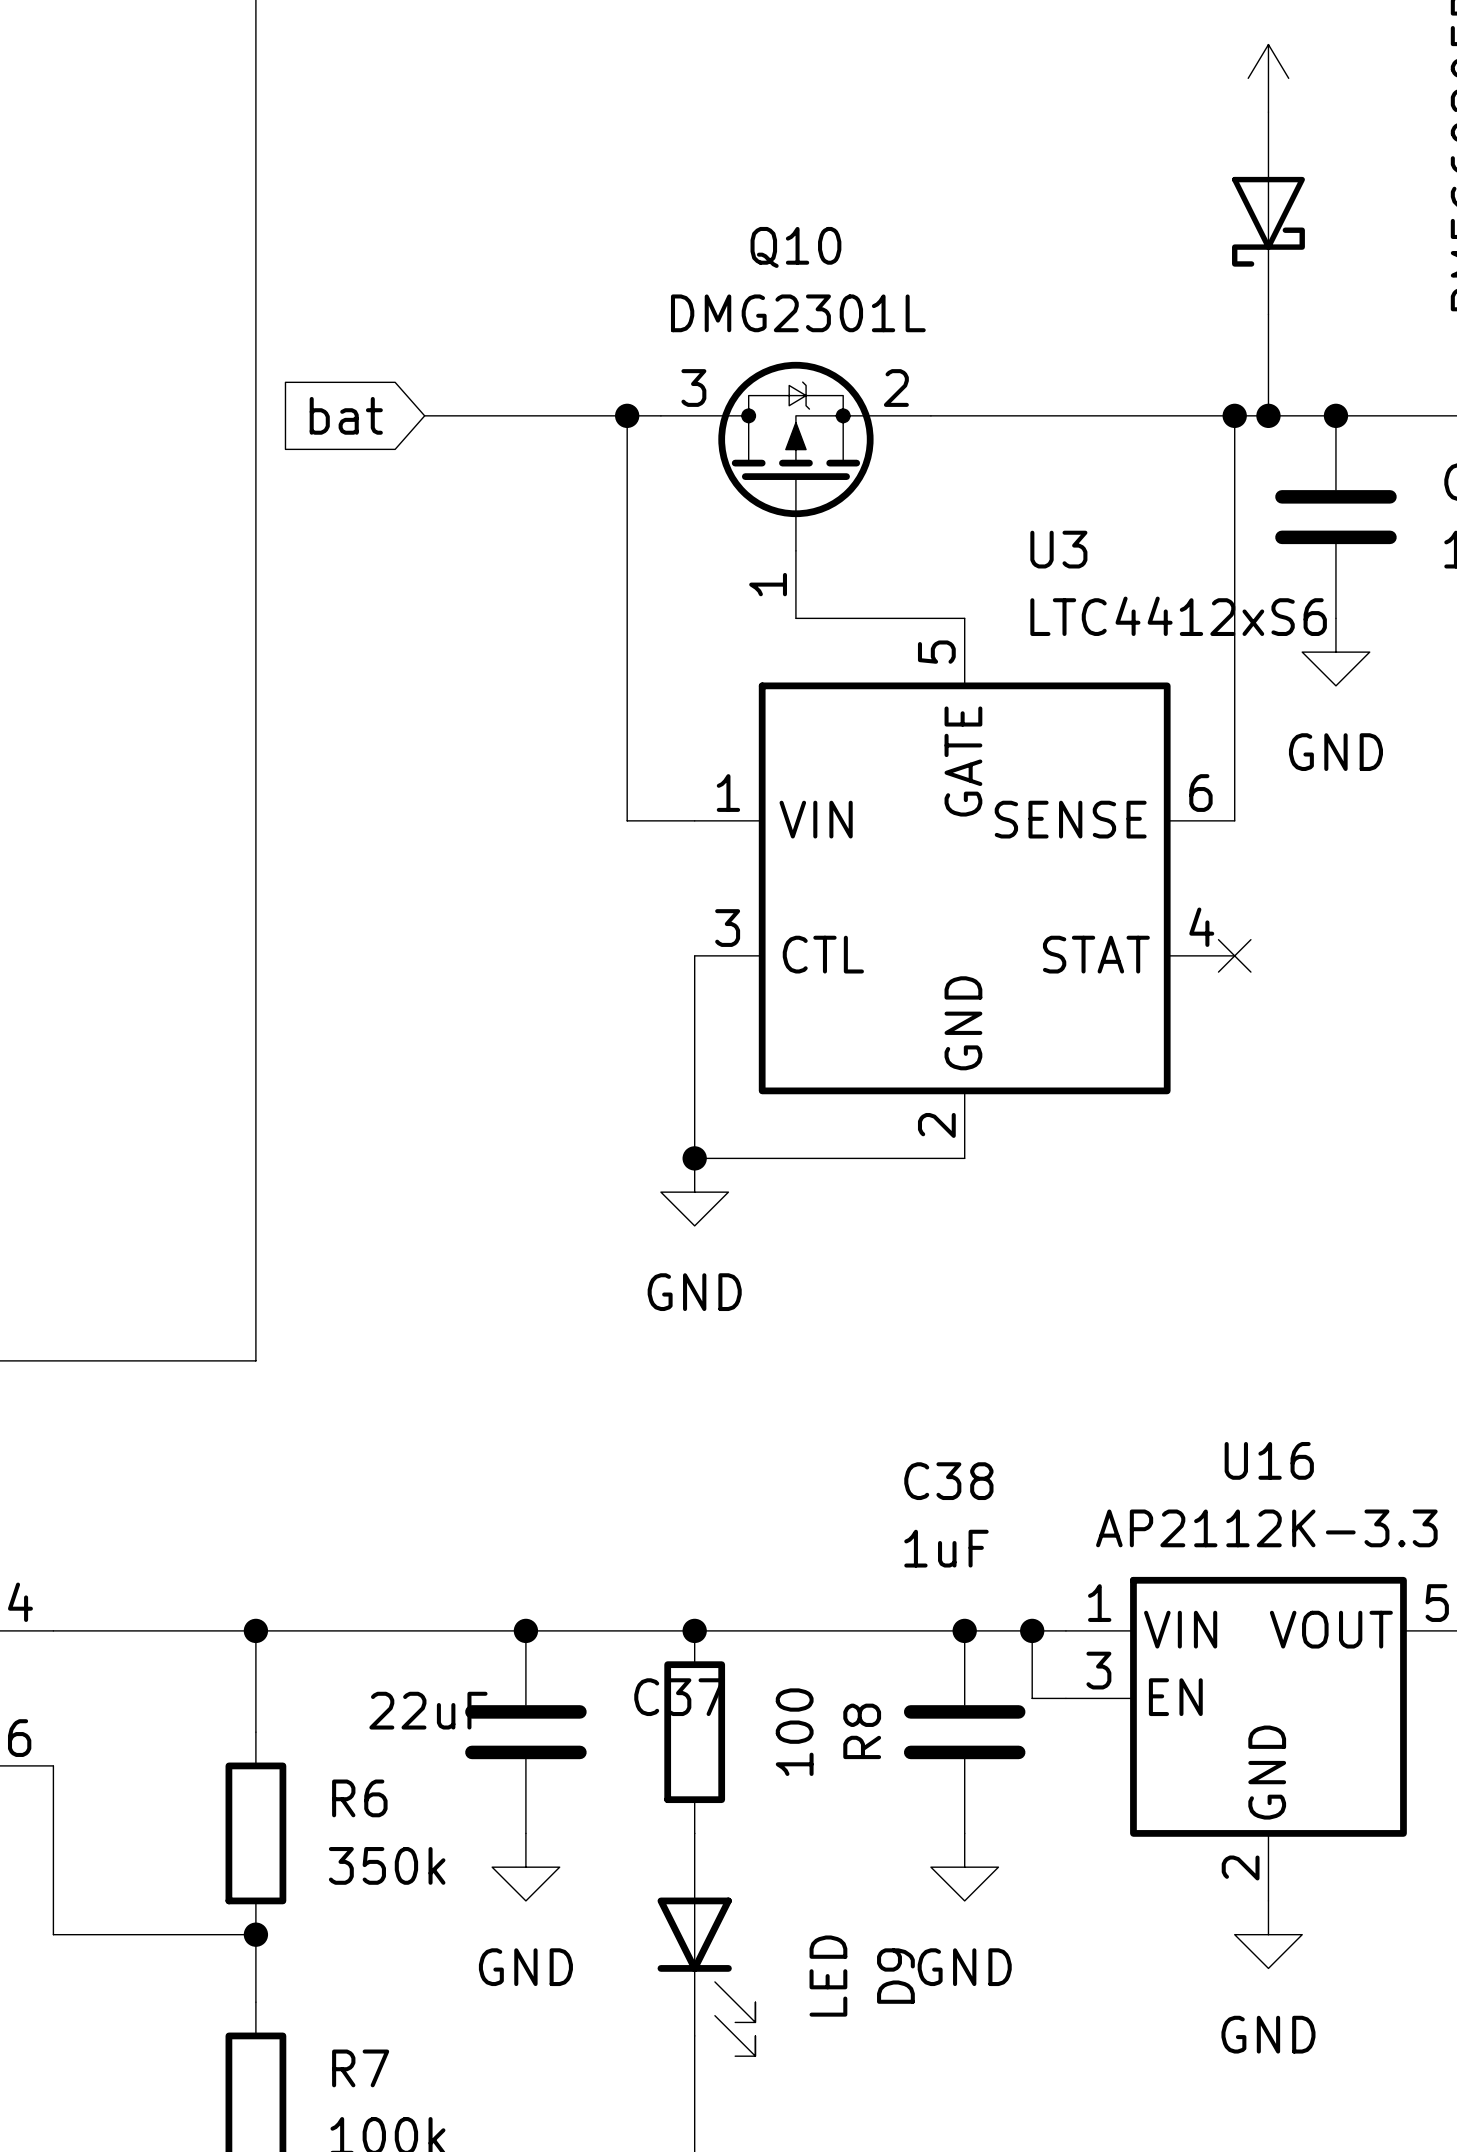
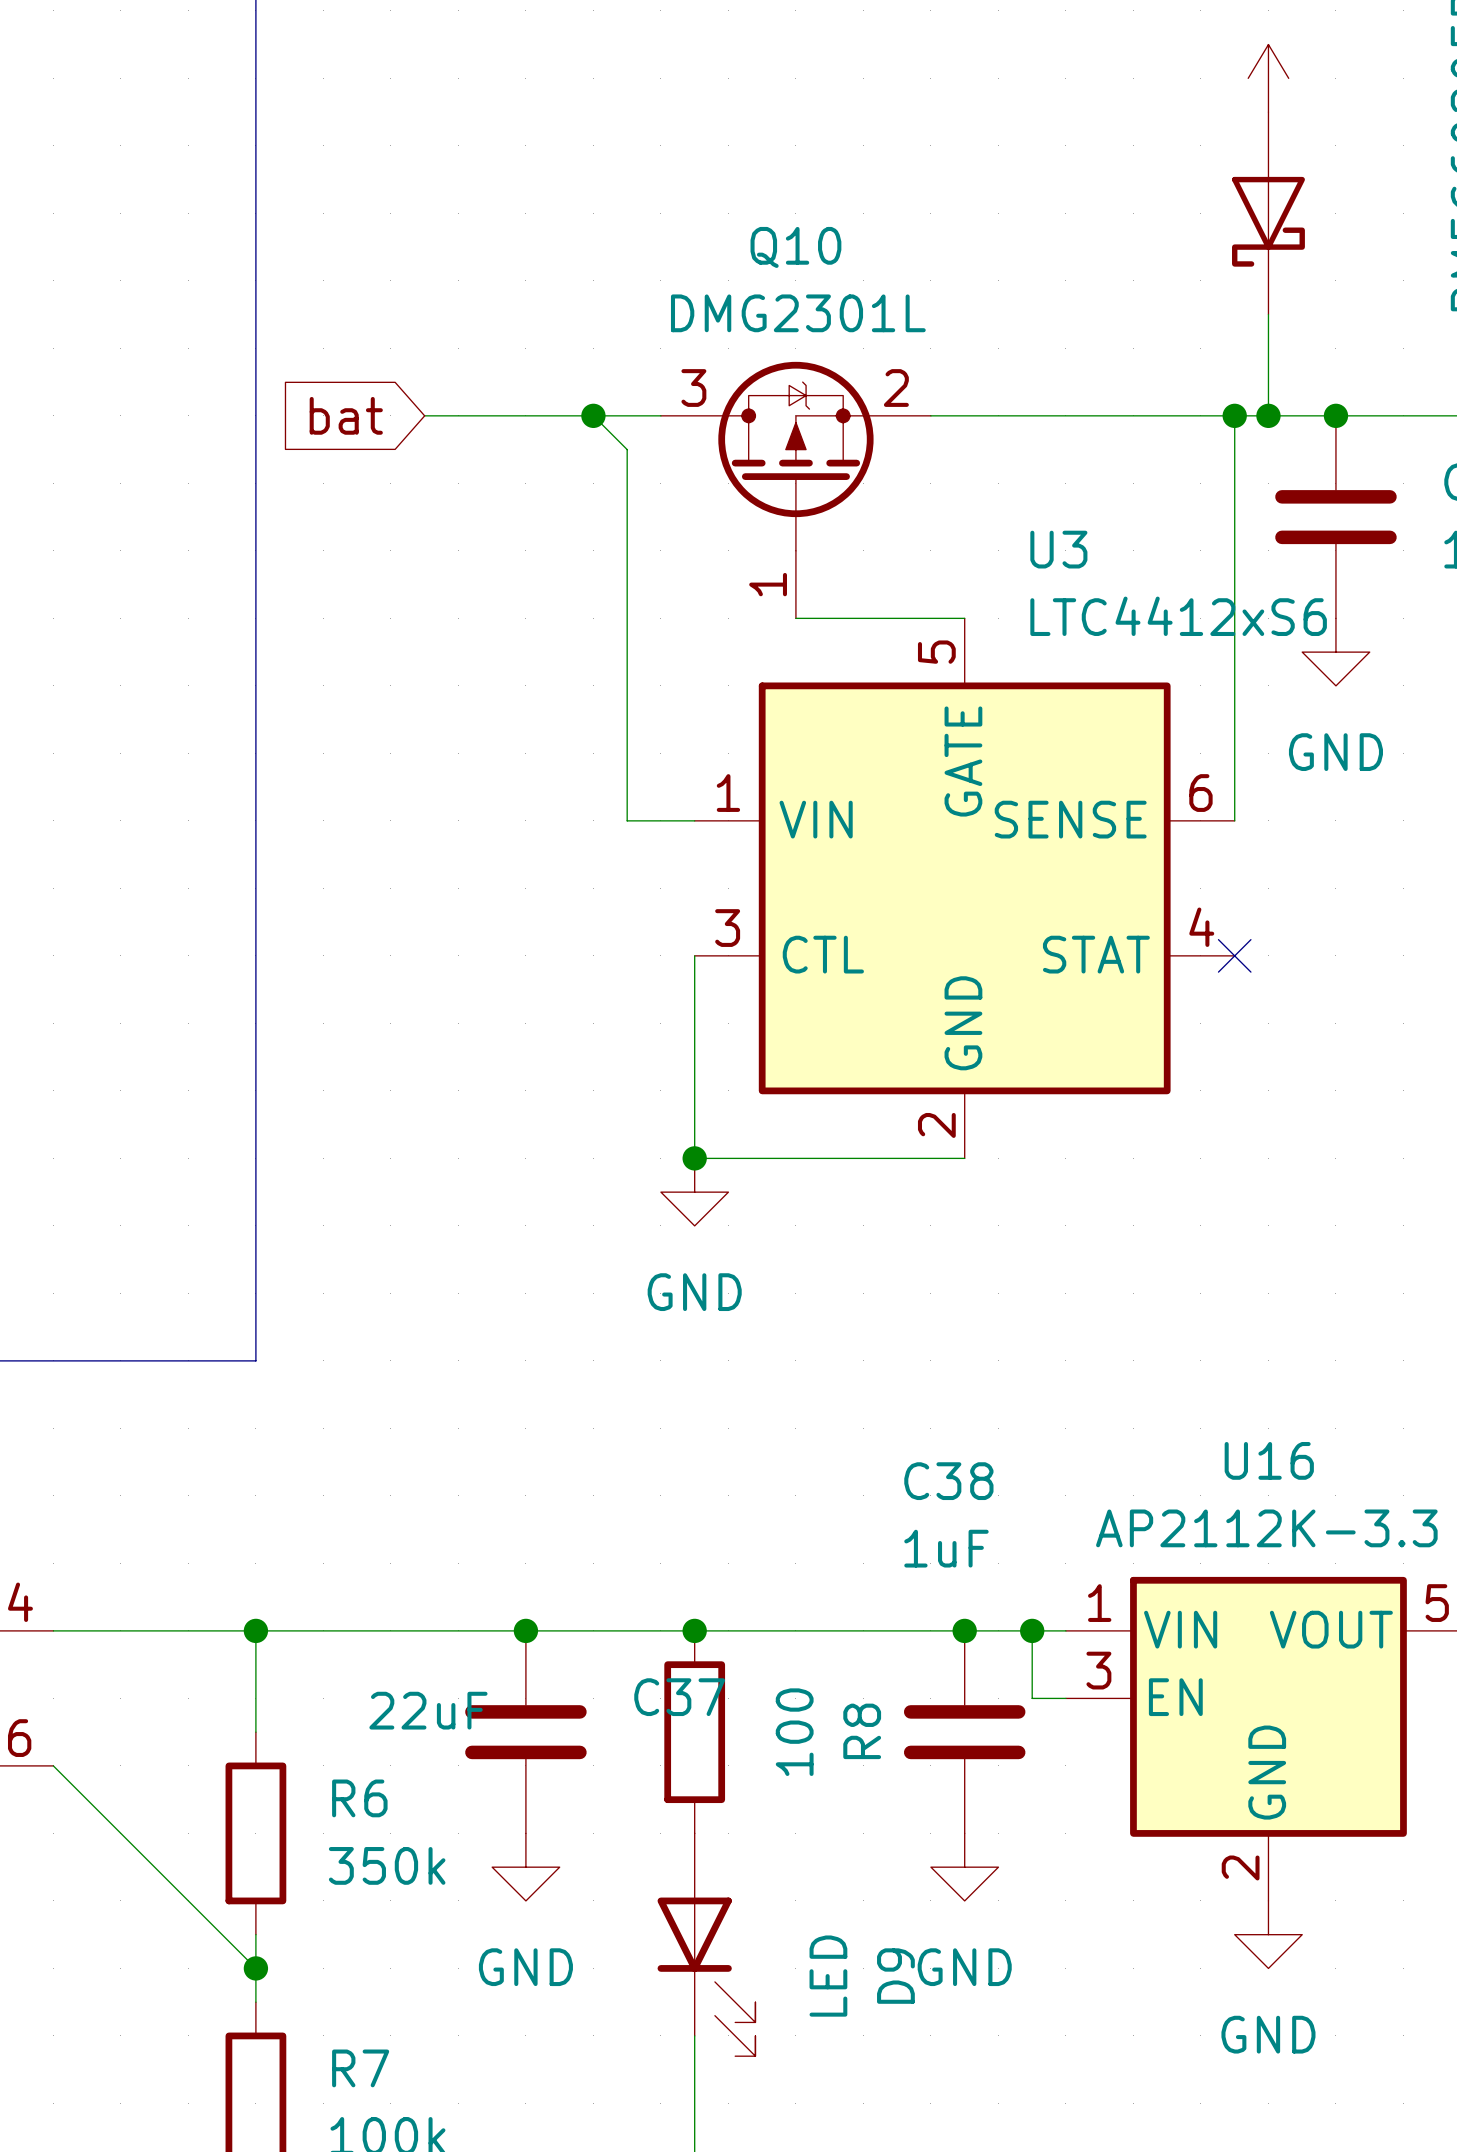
wire: (627, 415) (627, 449) -> (593, 415) (627, 449)
junction position: (627, 415) -> (593, 415)
wire: (53, 1765) (53, 1934) (255, 1934) -> (53, 1765) (255, 1968)
junction position: (255, 1934) -> (255, 1968)

